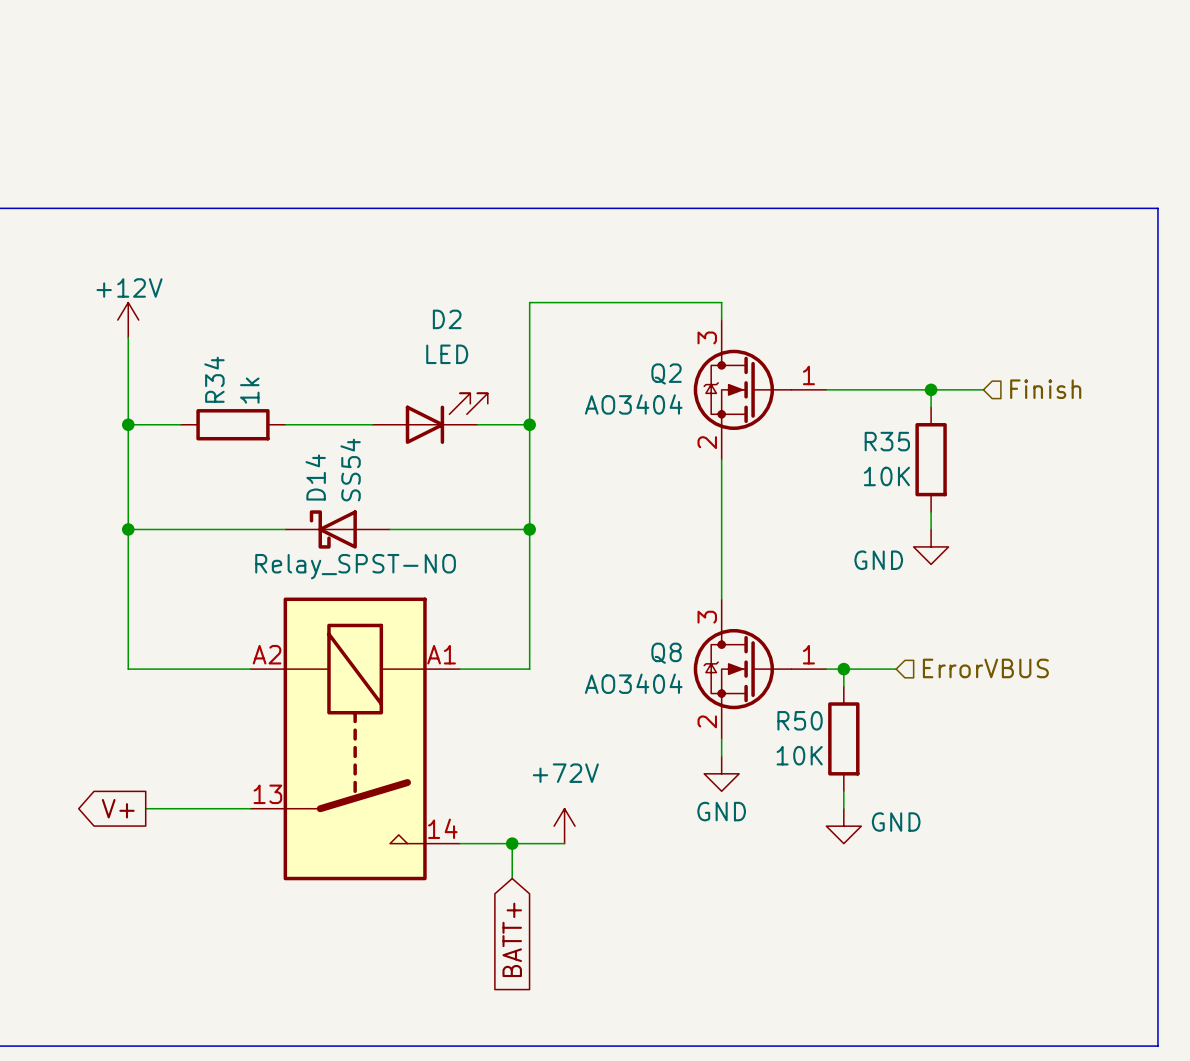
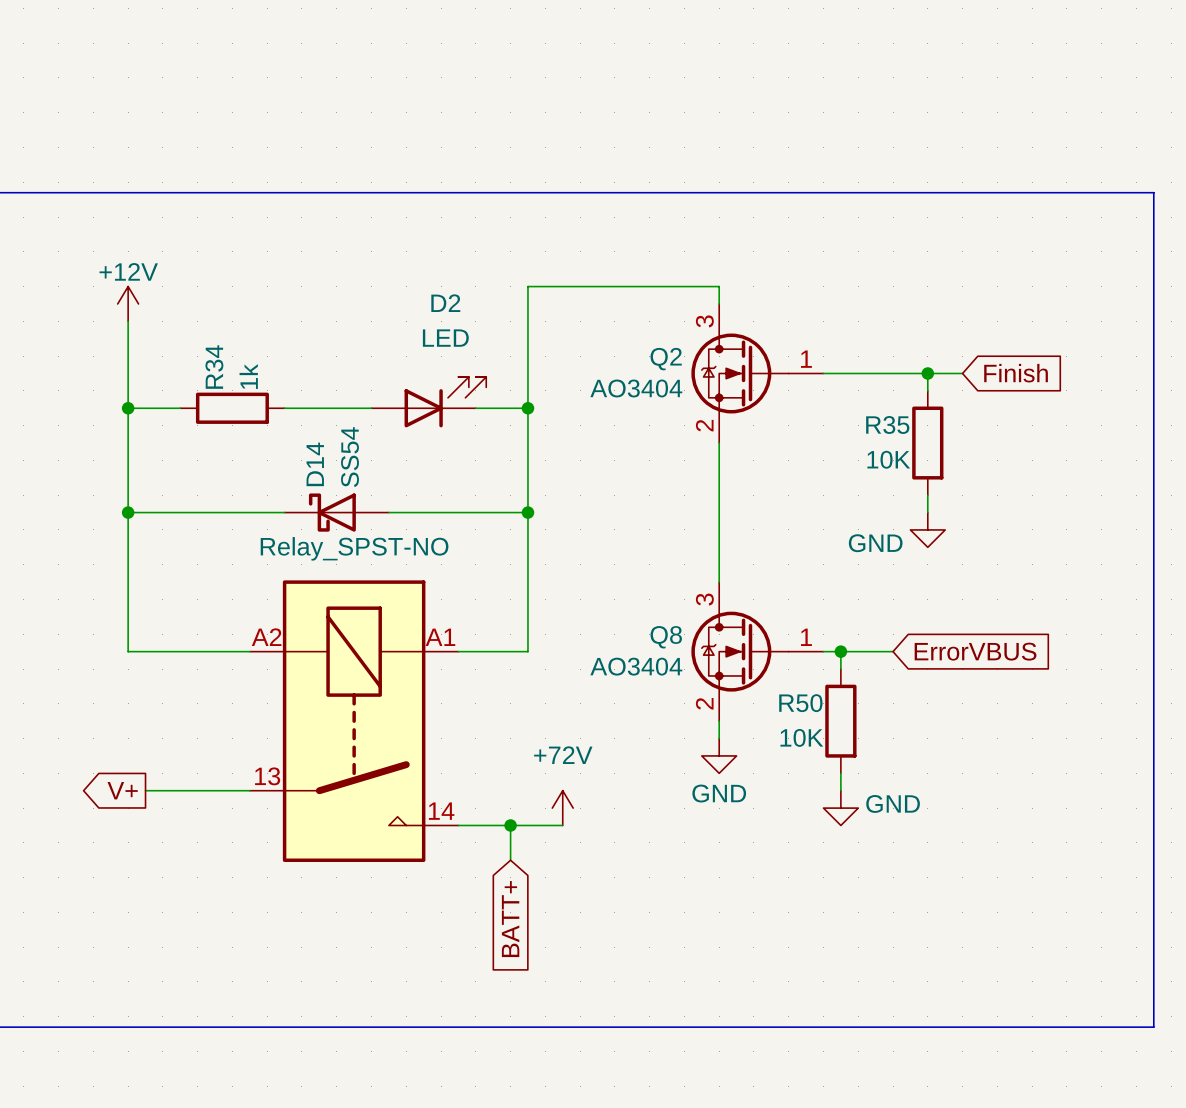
wire: (965, 389) (983, 389) -> none
global label: none -> Finish (1016, 373)
hierarchical label: Finish (1045, 389) -> none
hierarchical label: ErrorVBUS (985, 668) -> none
global label: none -> ErrorVBUS (975, 651)

